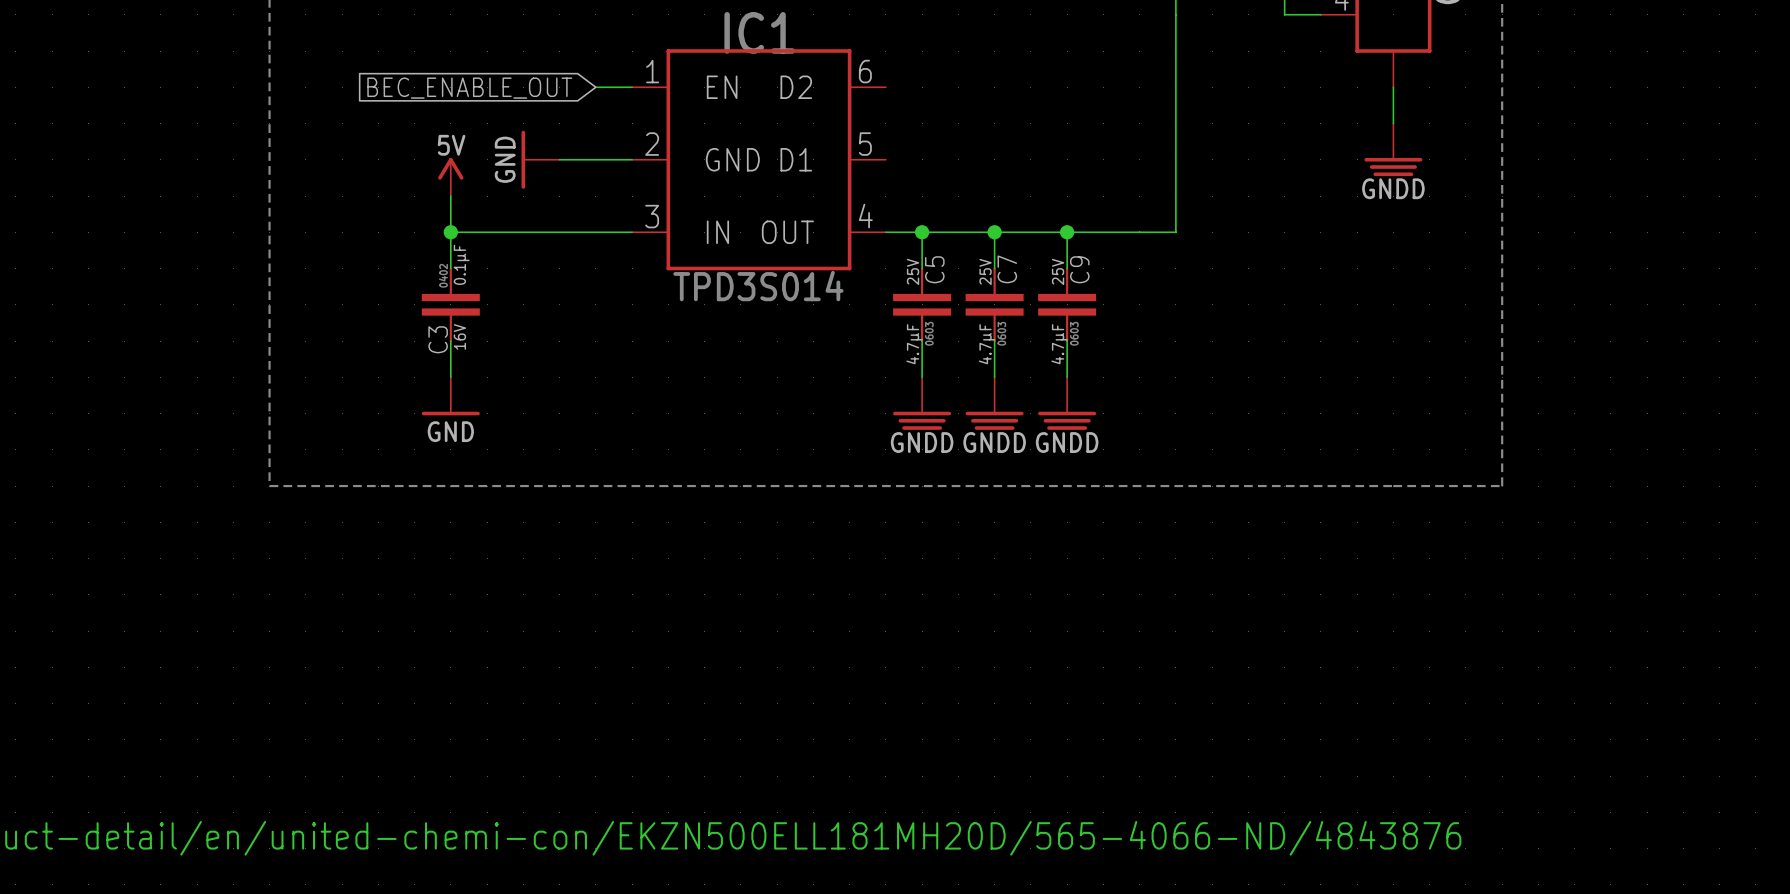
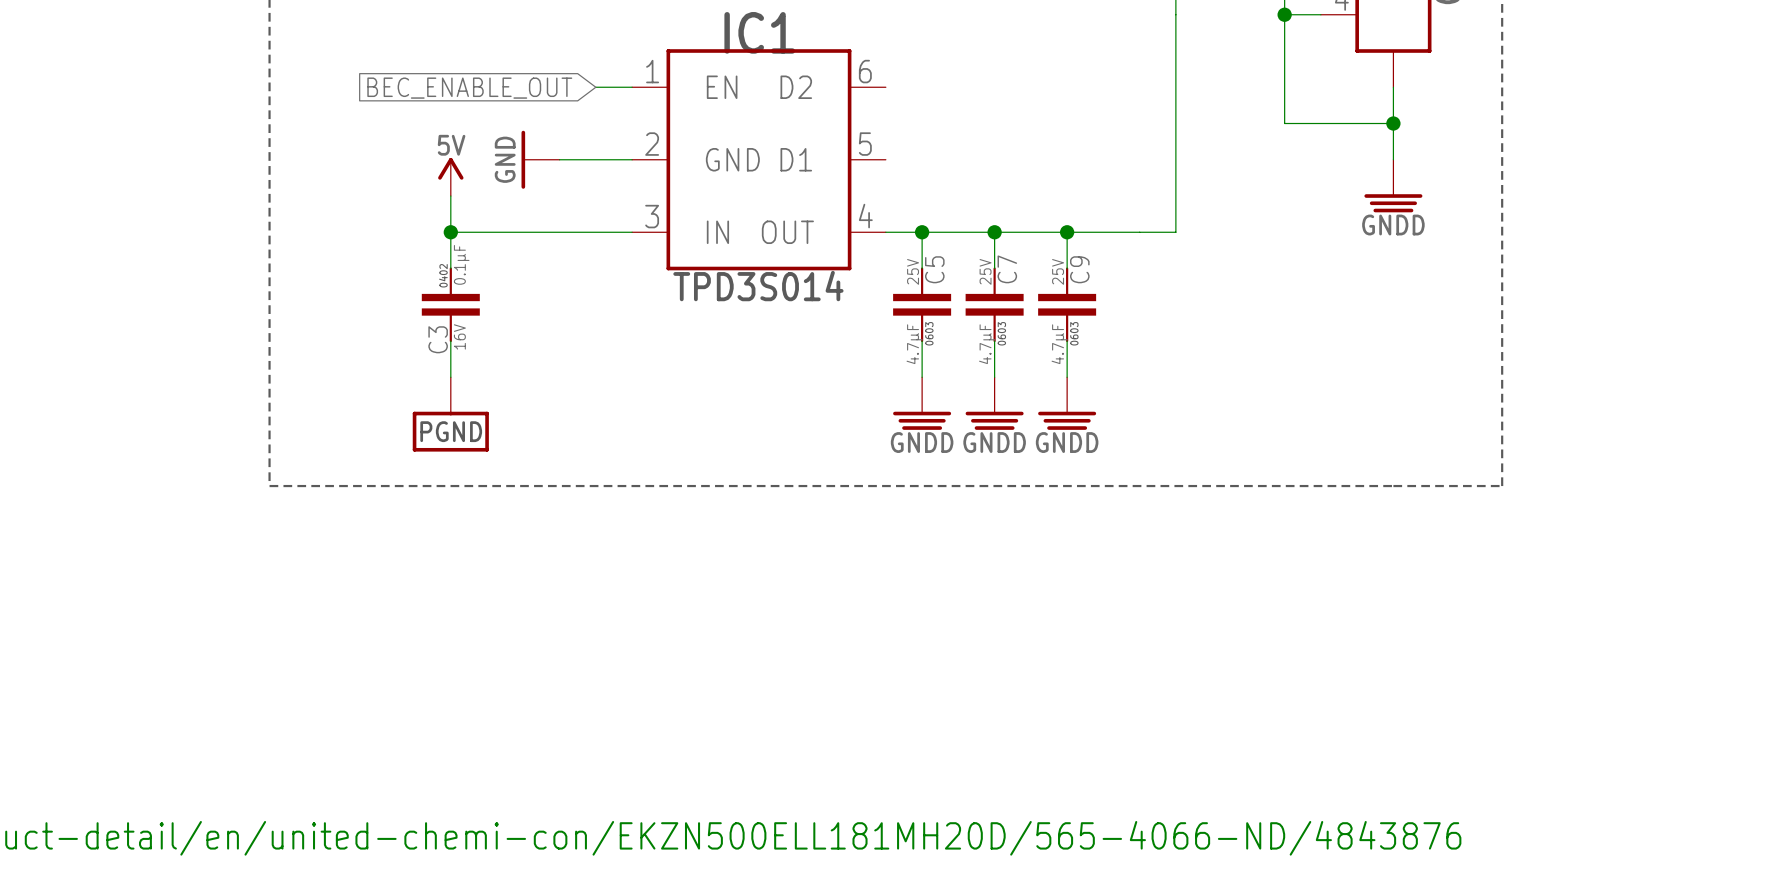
wire: none -> (1284, 14) (1284, 123) (1393, 123) (1393, 159)
junction: none -> (1284, 14)
junction: none -> (1393, 123)
power symbol position: GNDD (1393, 149) -> GNDD (1393, 186)
power symbol: GND (450, 396) -> none
power symbol: none -> PGND (450, 414)

